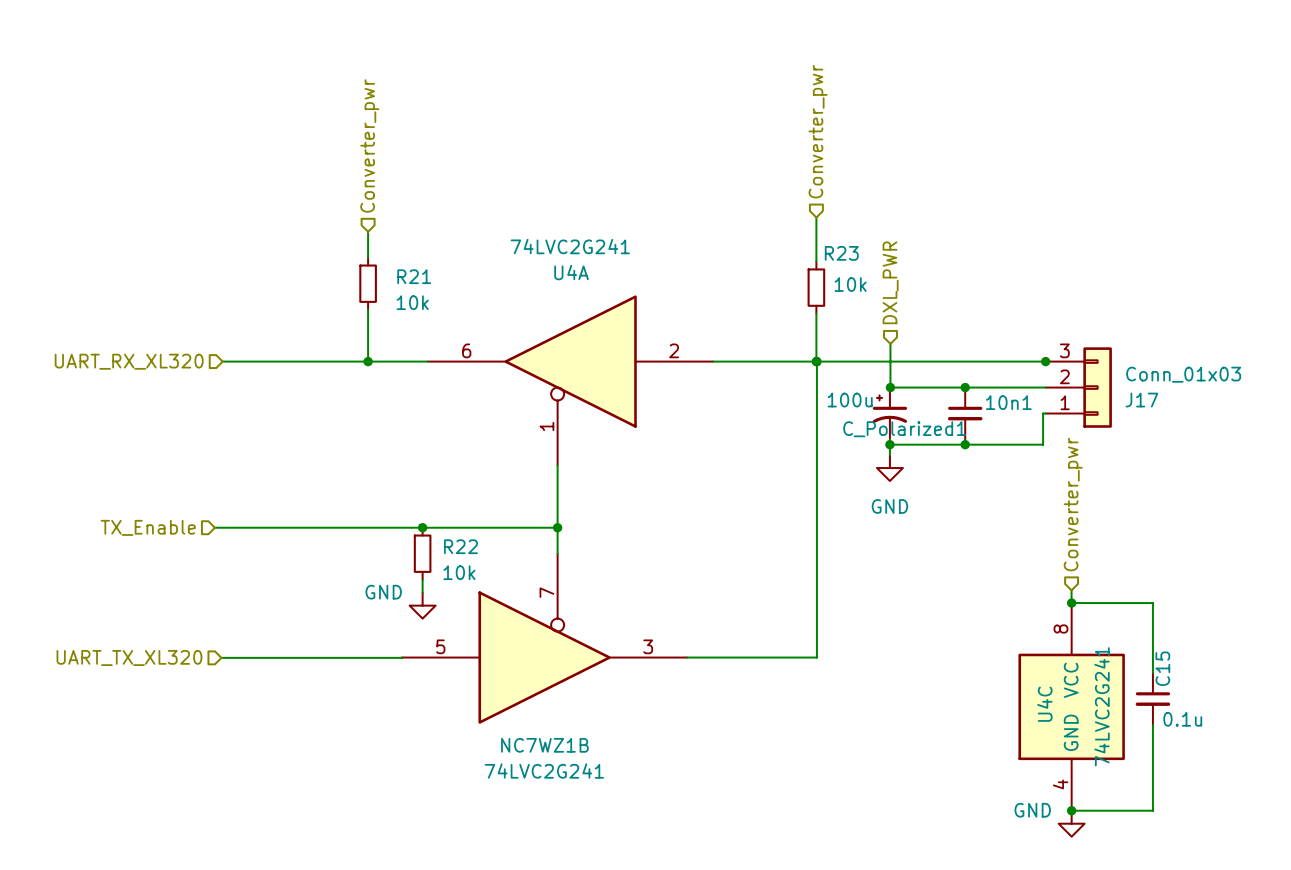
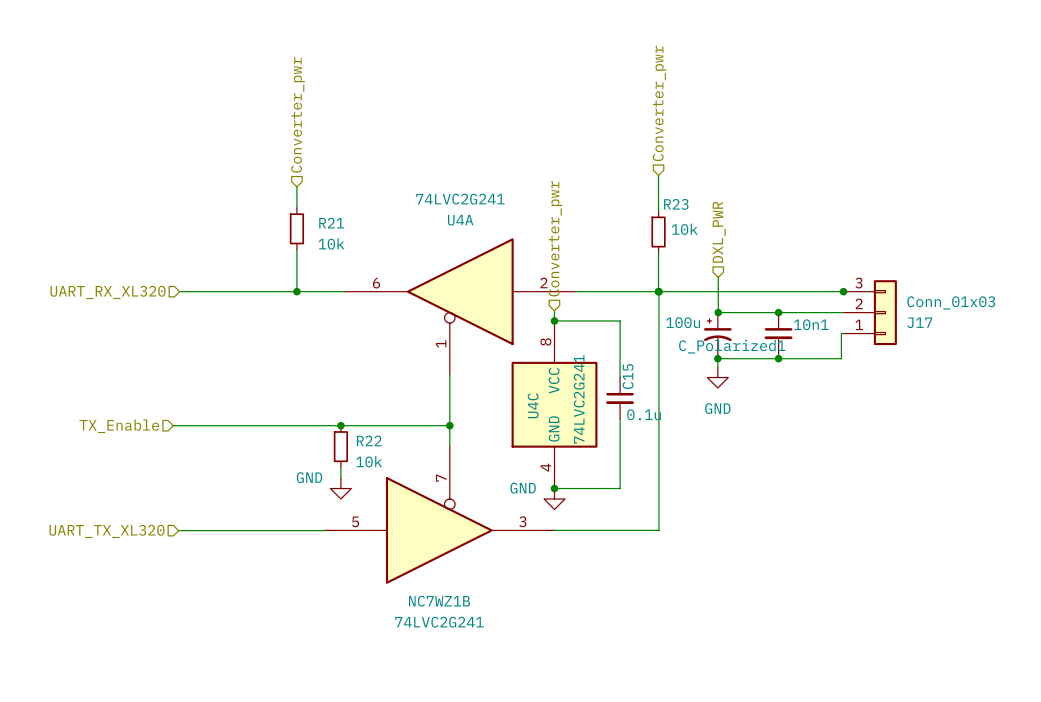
hierarchical label: none -> Converter_pwr (555, 238)
wire: none -> (554, 310) (554, 320) (620, 320) (620, 377)
junction: none -> (554, 320)
hierarchical label: Converter_pwr (1073, 504) -> none
wire: none -> (620, 419) (620, 488) (554, 488)
wire: (1071, 590) (1071, 603) (1152, 603) (1152, 673) -> none
junction: (1071, 603) -> none
junction: none -> (554, 488)
power symbol: none -> GND (554, 499)
C15 position: (1152, 699) -> (620, 398)
U4C position: (1071, 706) -> (554, 404)
wire: (1152, 724) (1152, 810) (1071, 810) -> none
junction: (1071, 810) -> none
power symbol: GND (1071, 823) -> none

